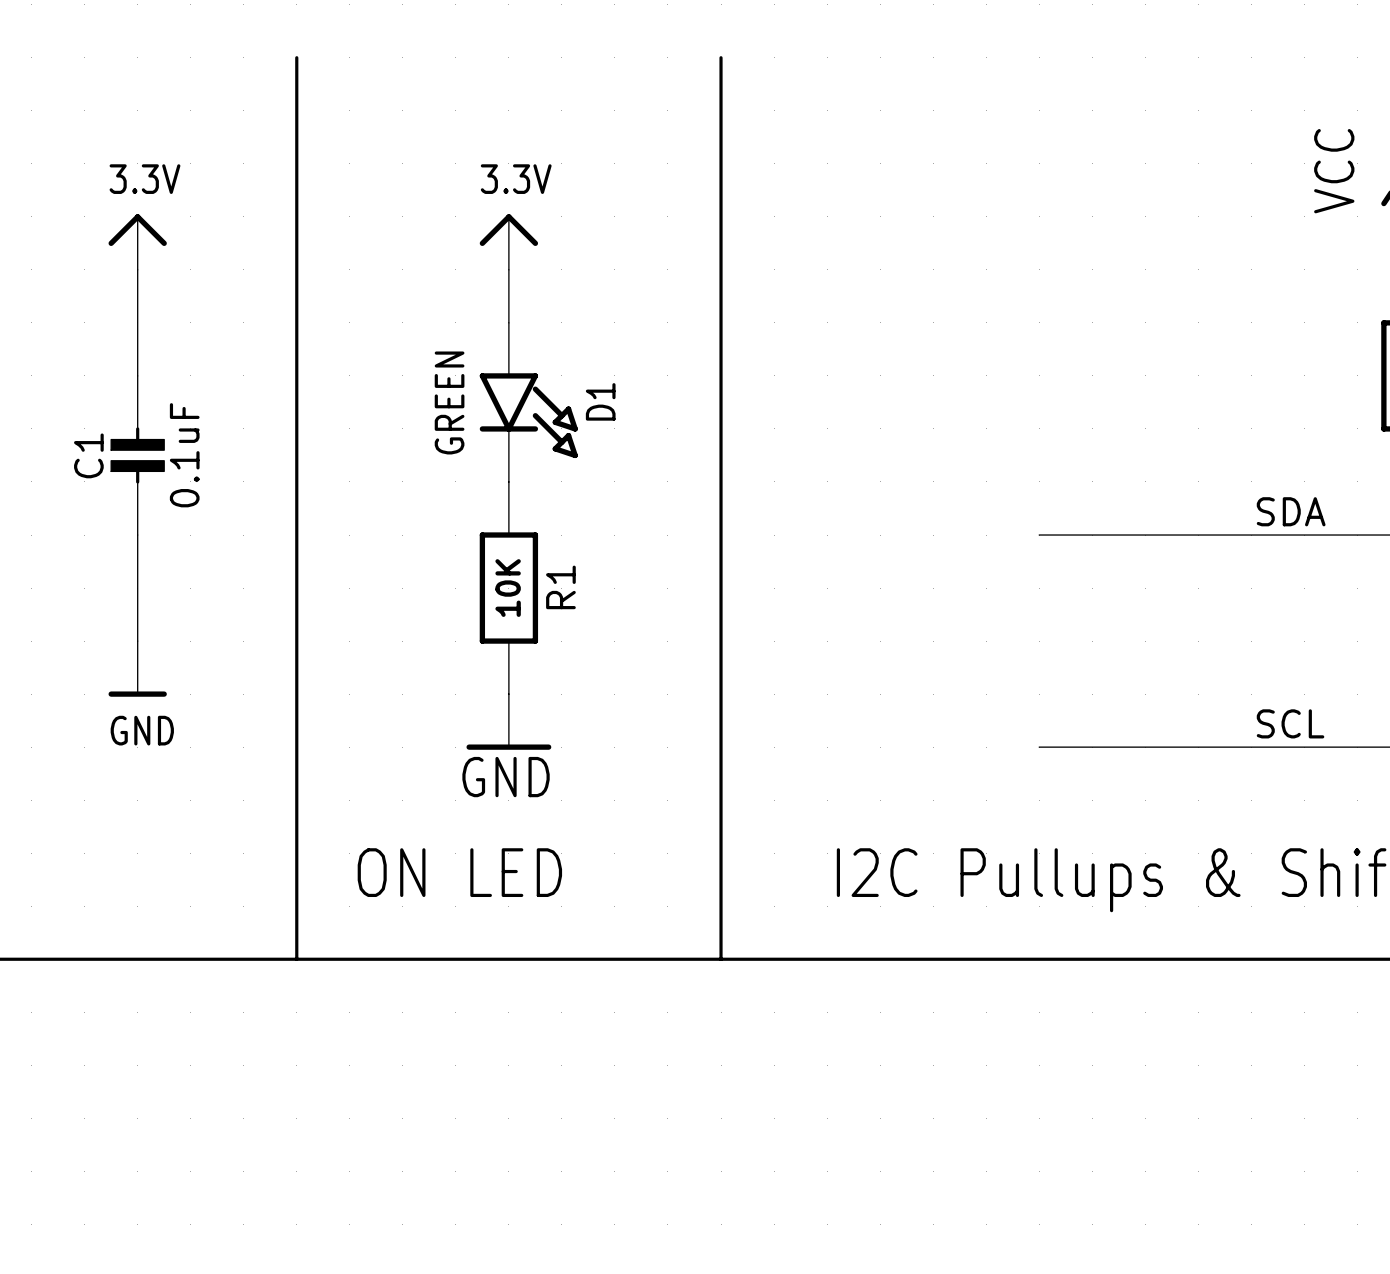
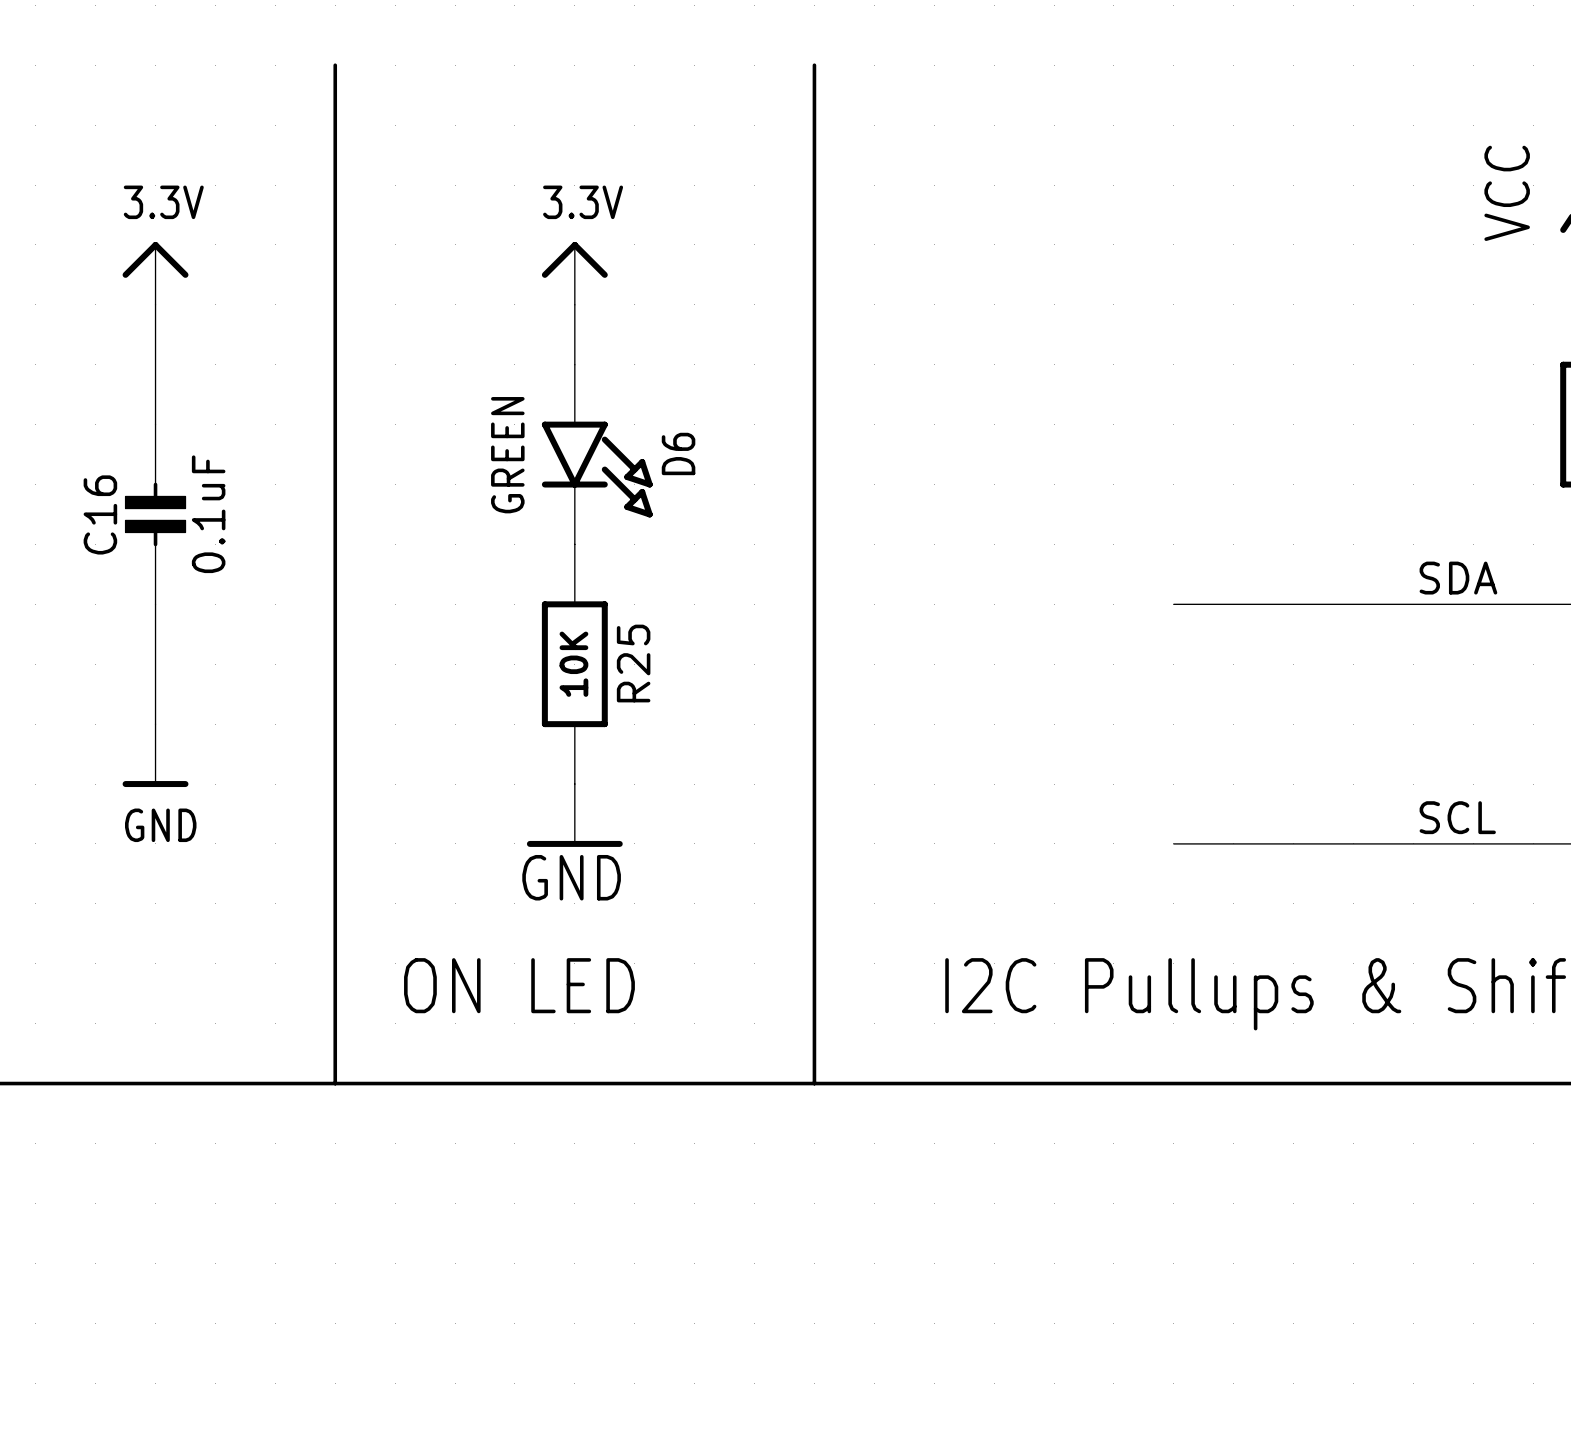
D1 name: D1 (600, 401) -> D6 (678, 453)
C1 name: C1 (88, 455) -> C16 (100, 514)
R1 name: R1 (560, 587) -> R25 (633, 663)

